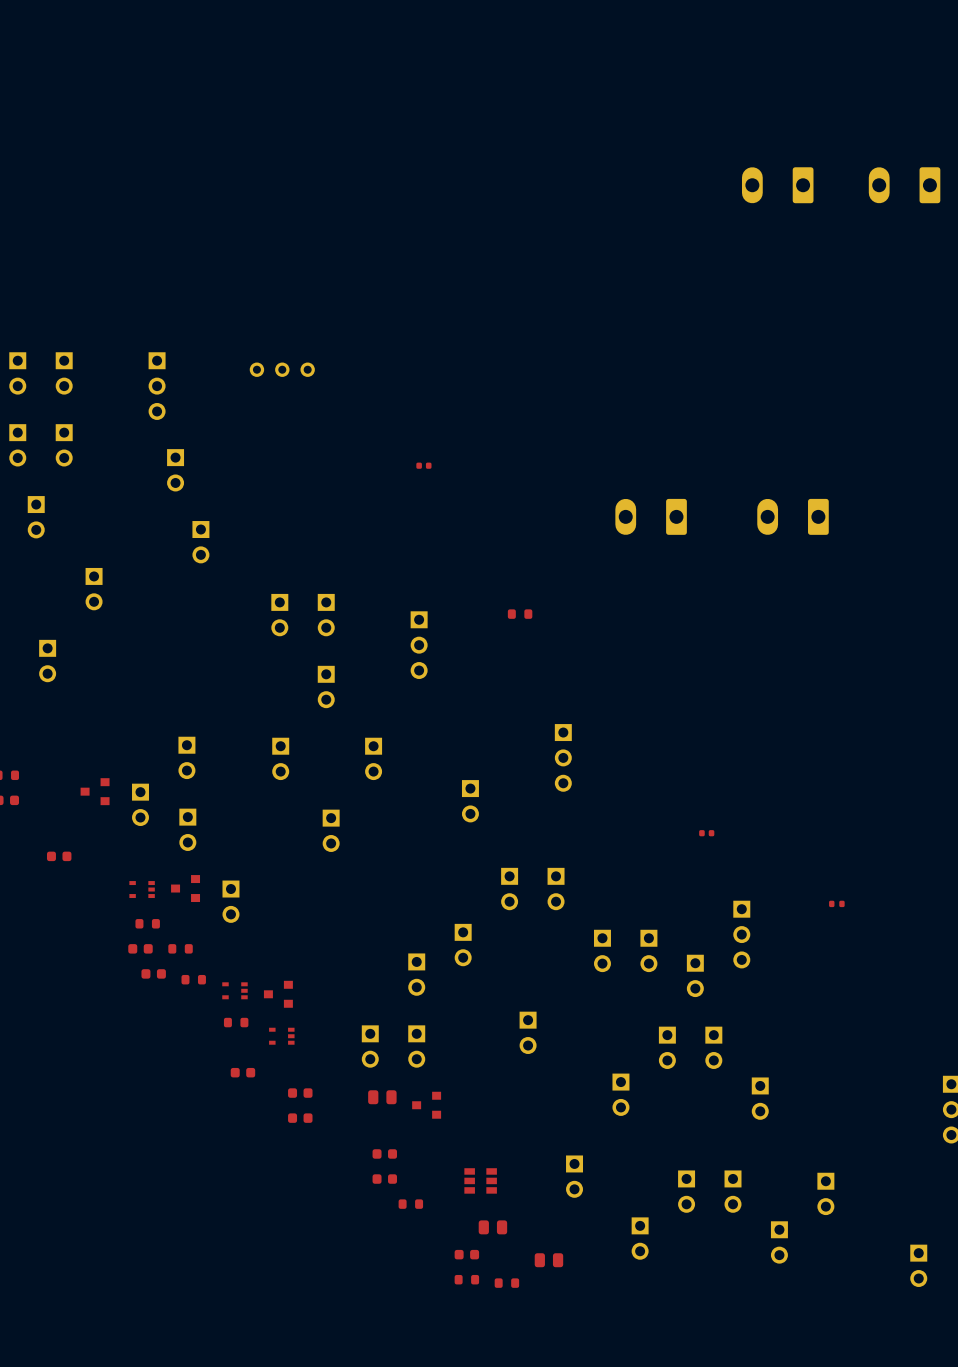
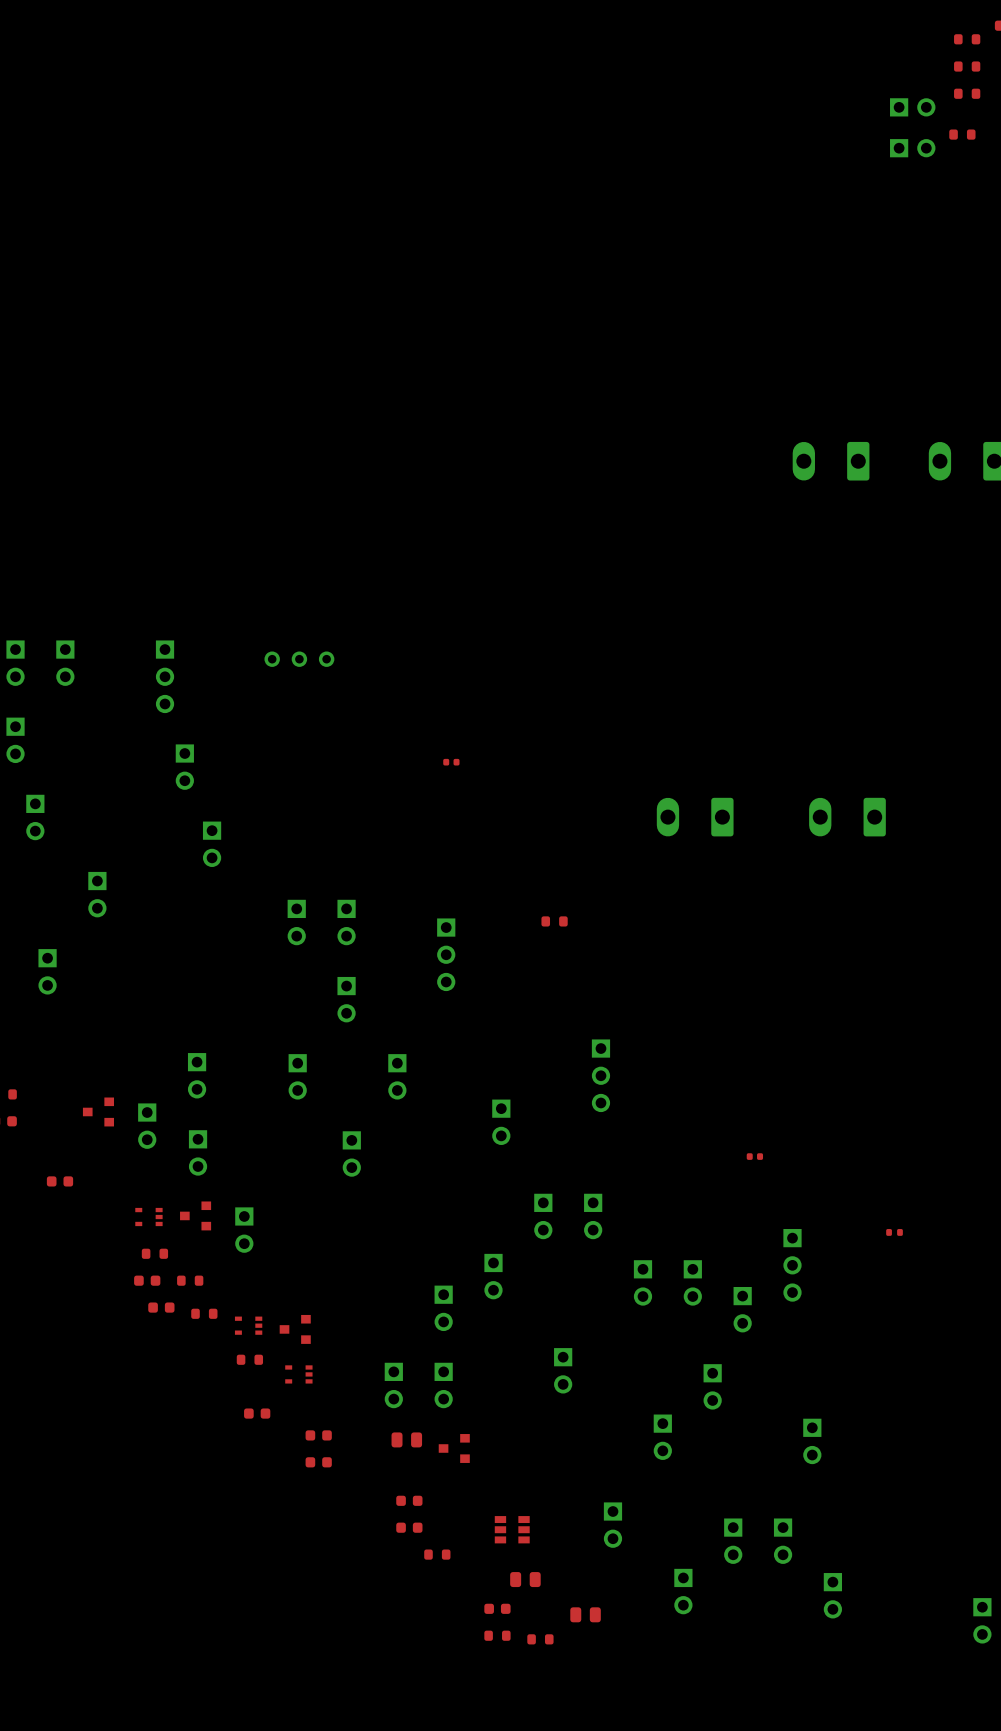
part: (64, 445) -> none
part: (713, 1047) -> none
part: (825, 1193) -> none

